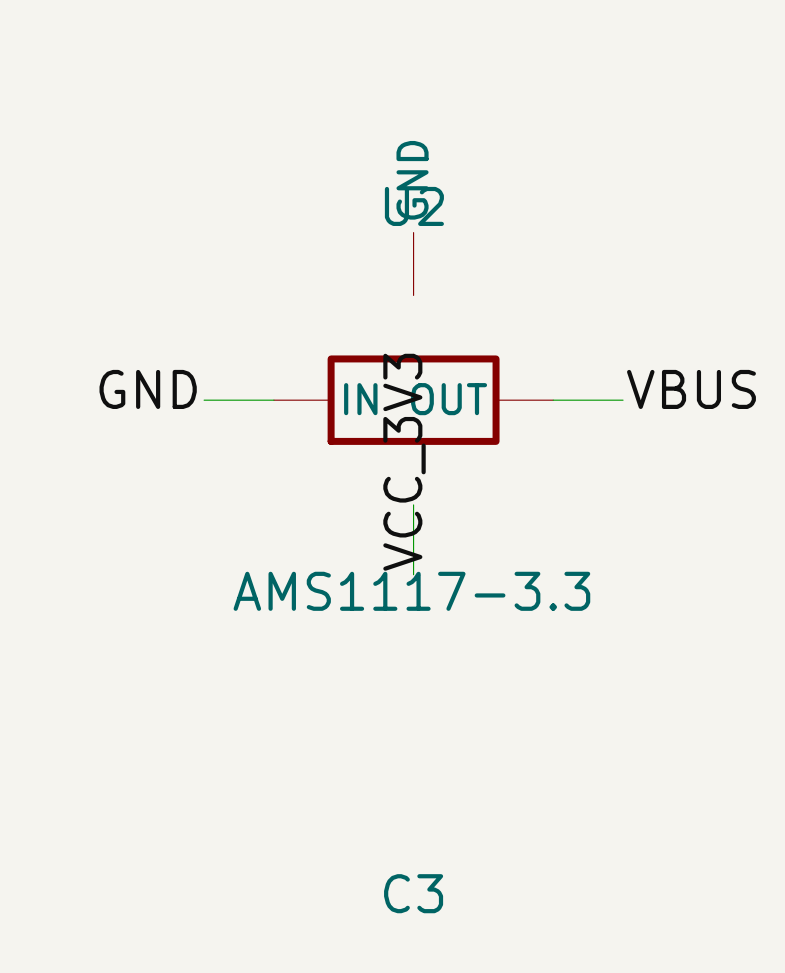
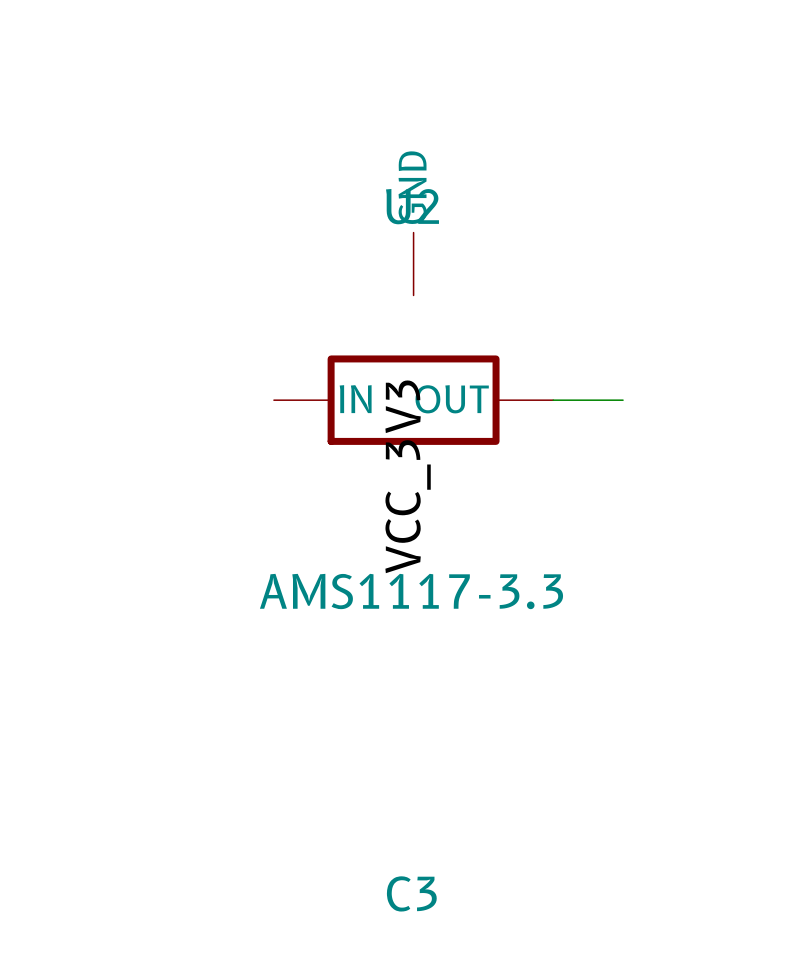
label: GND (148, 389) -> none
label: VBUS (691, 389) -> none
wire: (204, 400) (273, 400) -> none
wire: (413, 504) (413, 574) -> none

